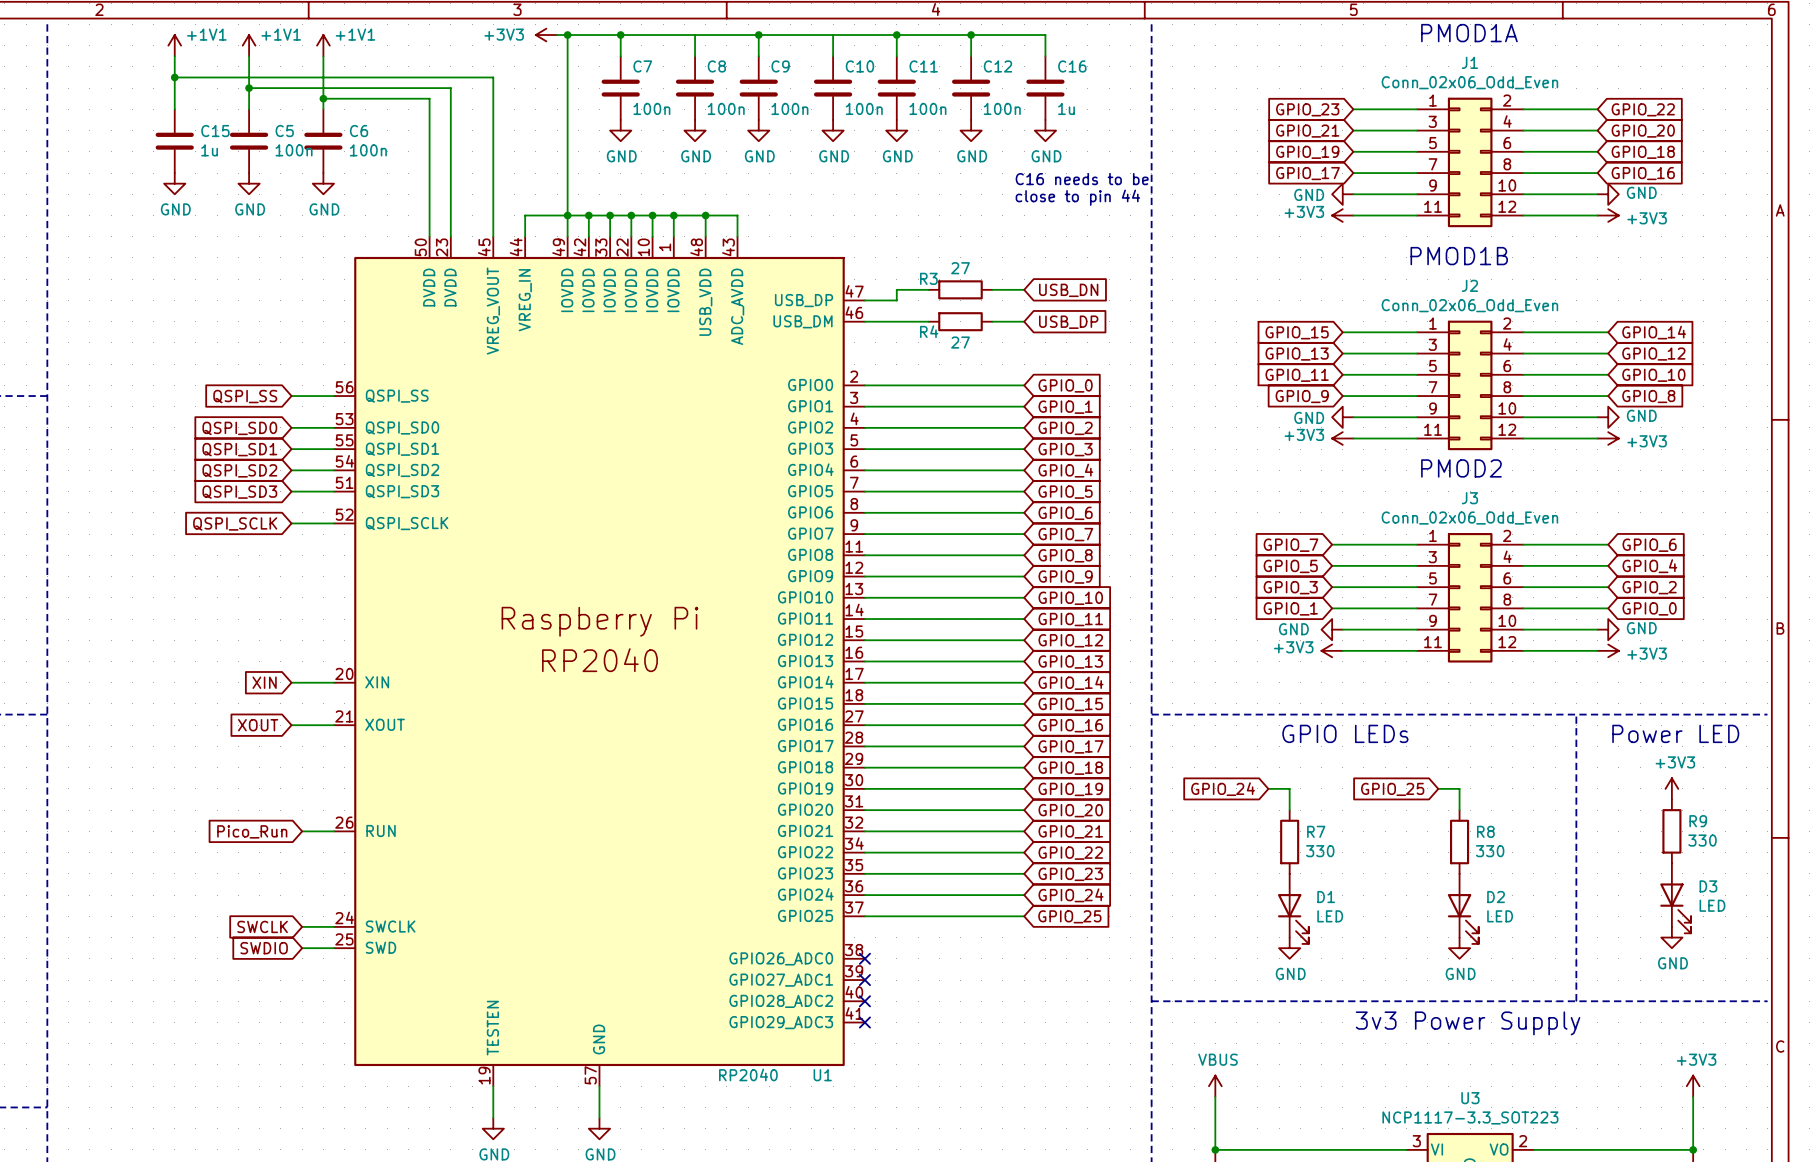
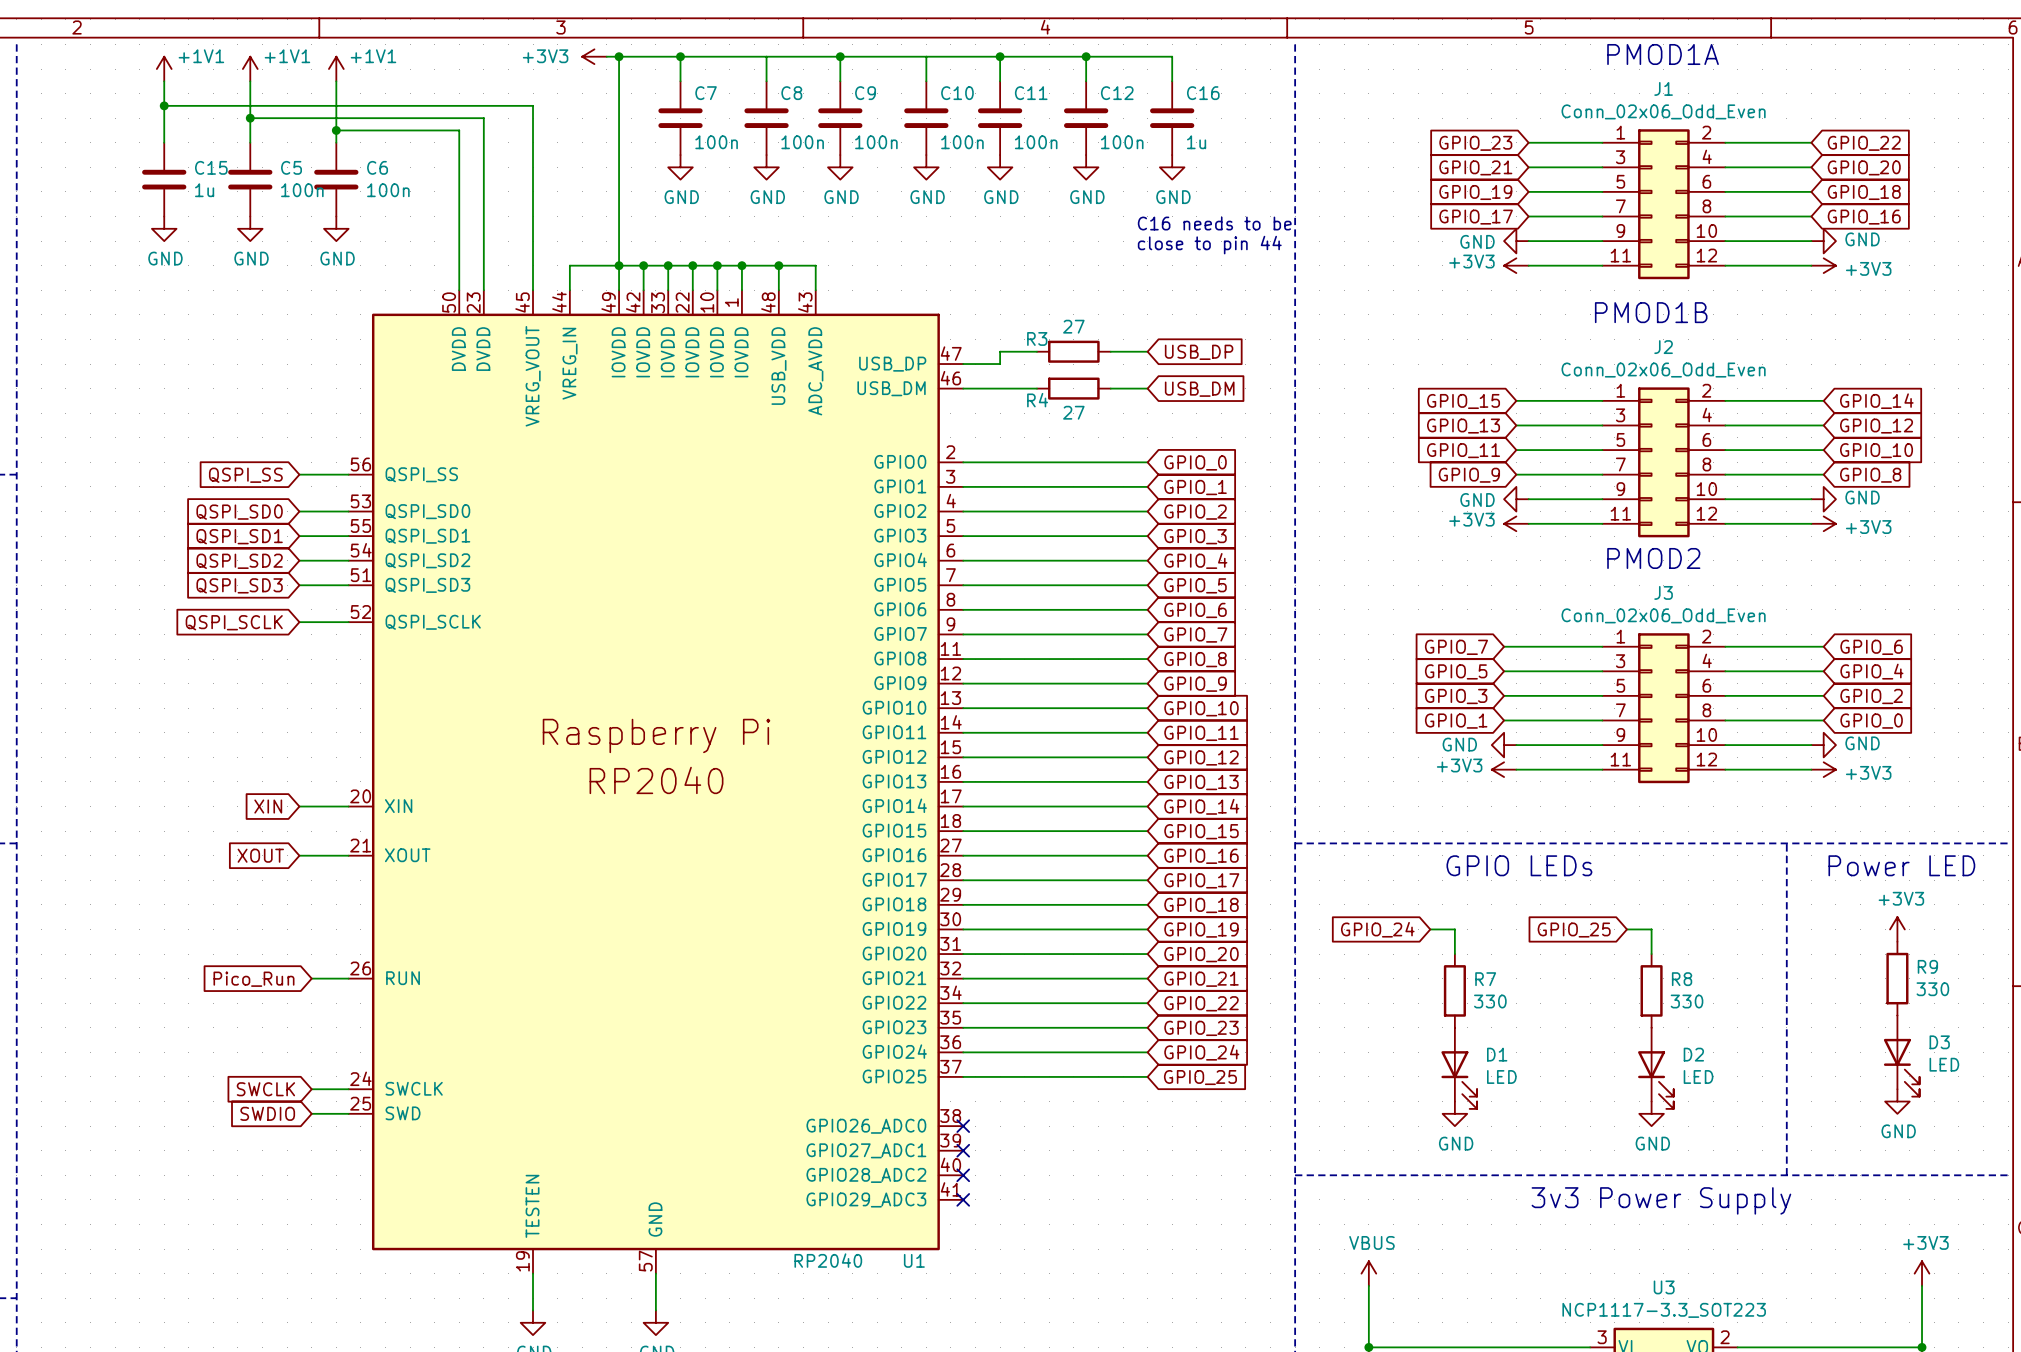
global label: USB_DN (1068, 290) -> USB_DP (1199, 352)
global label: USB_DP (1068, 322) -> USB_DM (1199, 389)

